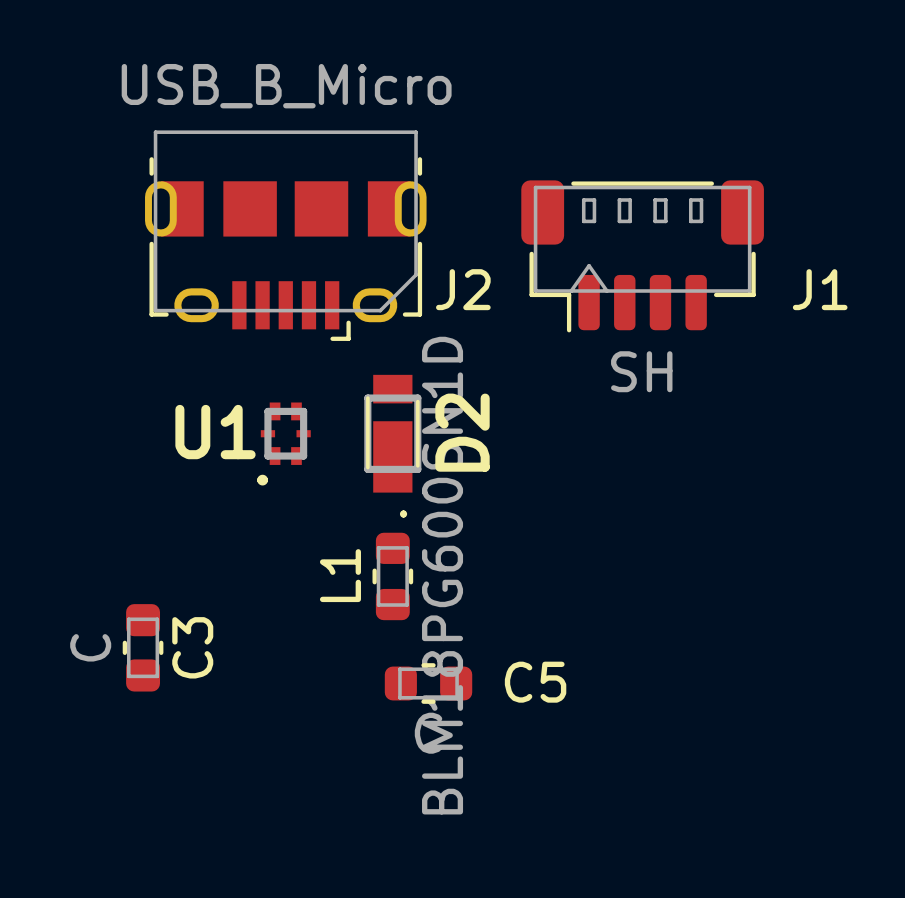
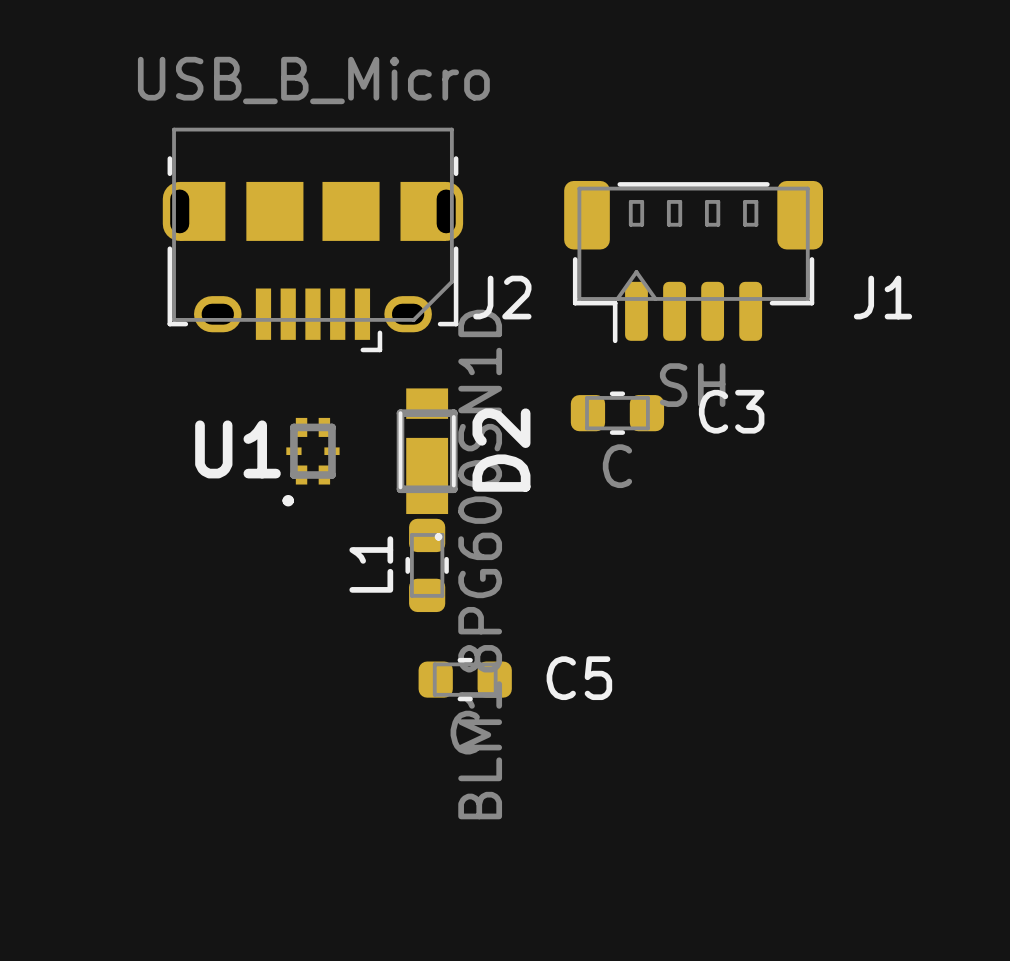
L1 position: (392, 576) -> (427, 565)
C3 value position: C (90, 647) -> C (617, 466)
C3 rotation: 0° (143, 647) -> 90° clockwise (617, 413)
C3 position: (143, 647) -> (617, 413)
C5 position: (428, 683) -> (465, 679)

